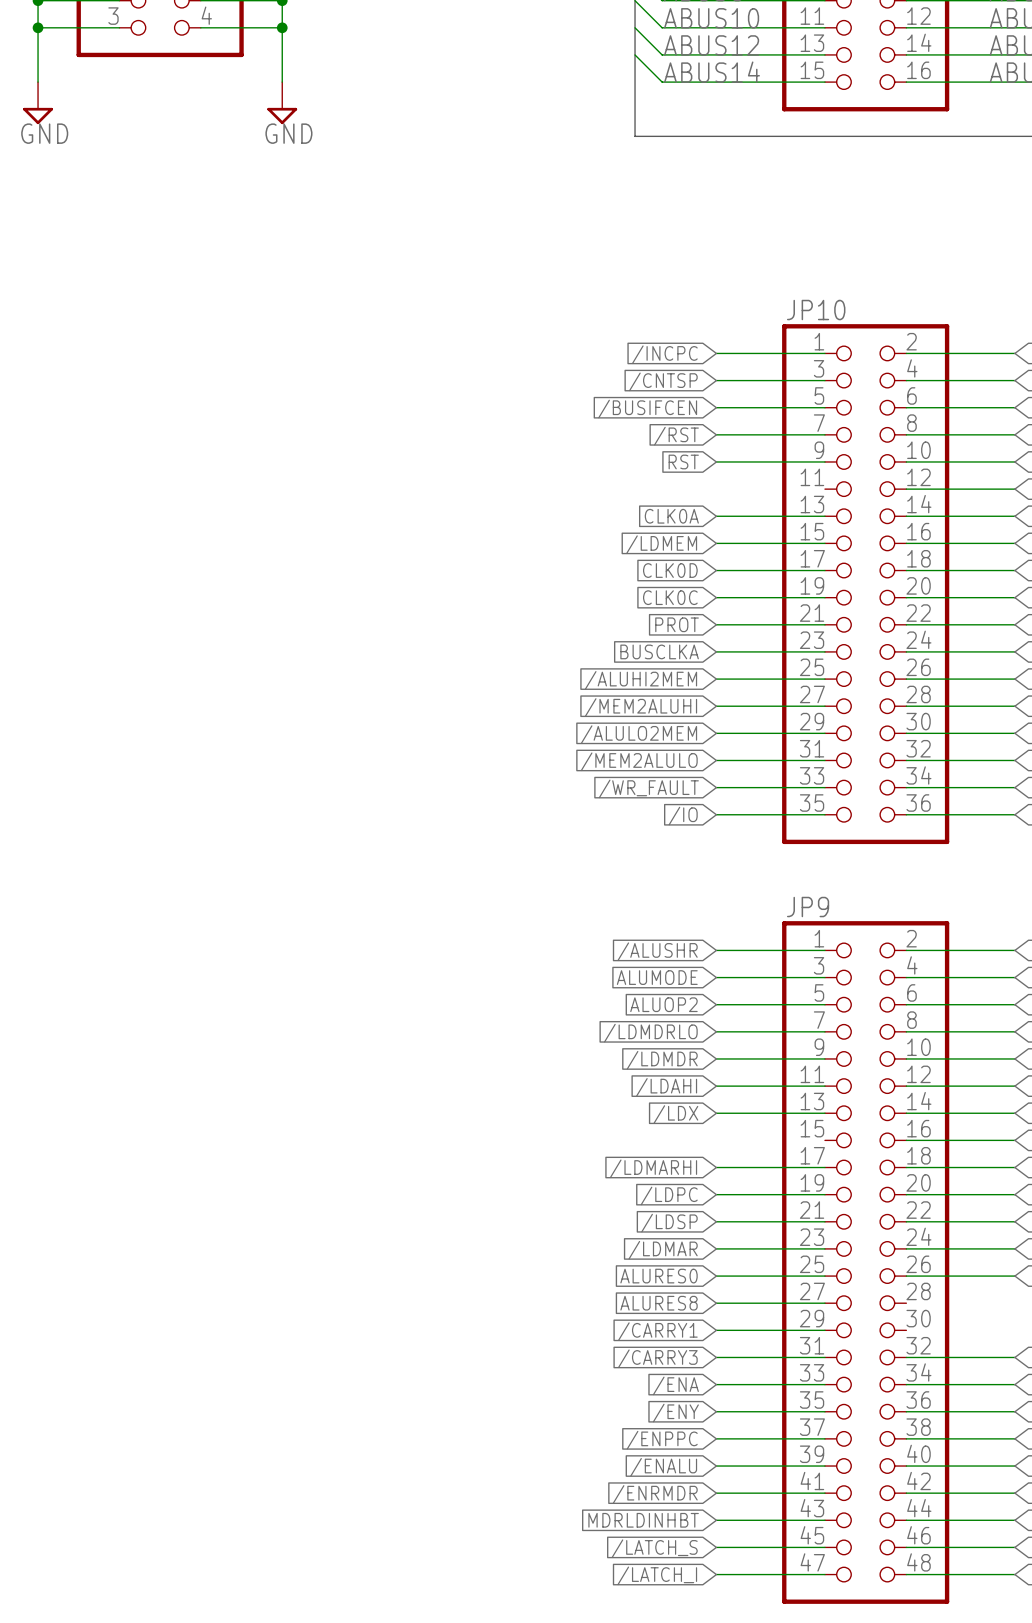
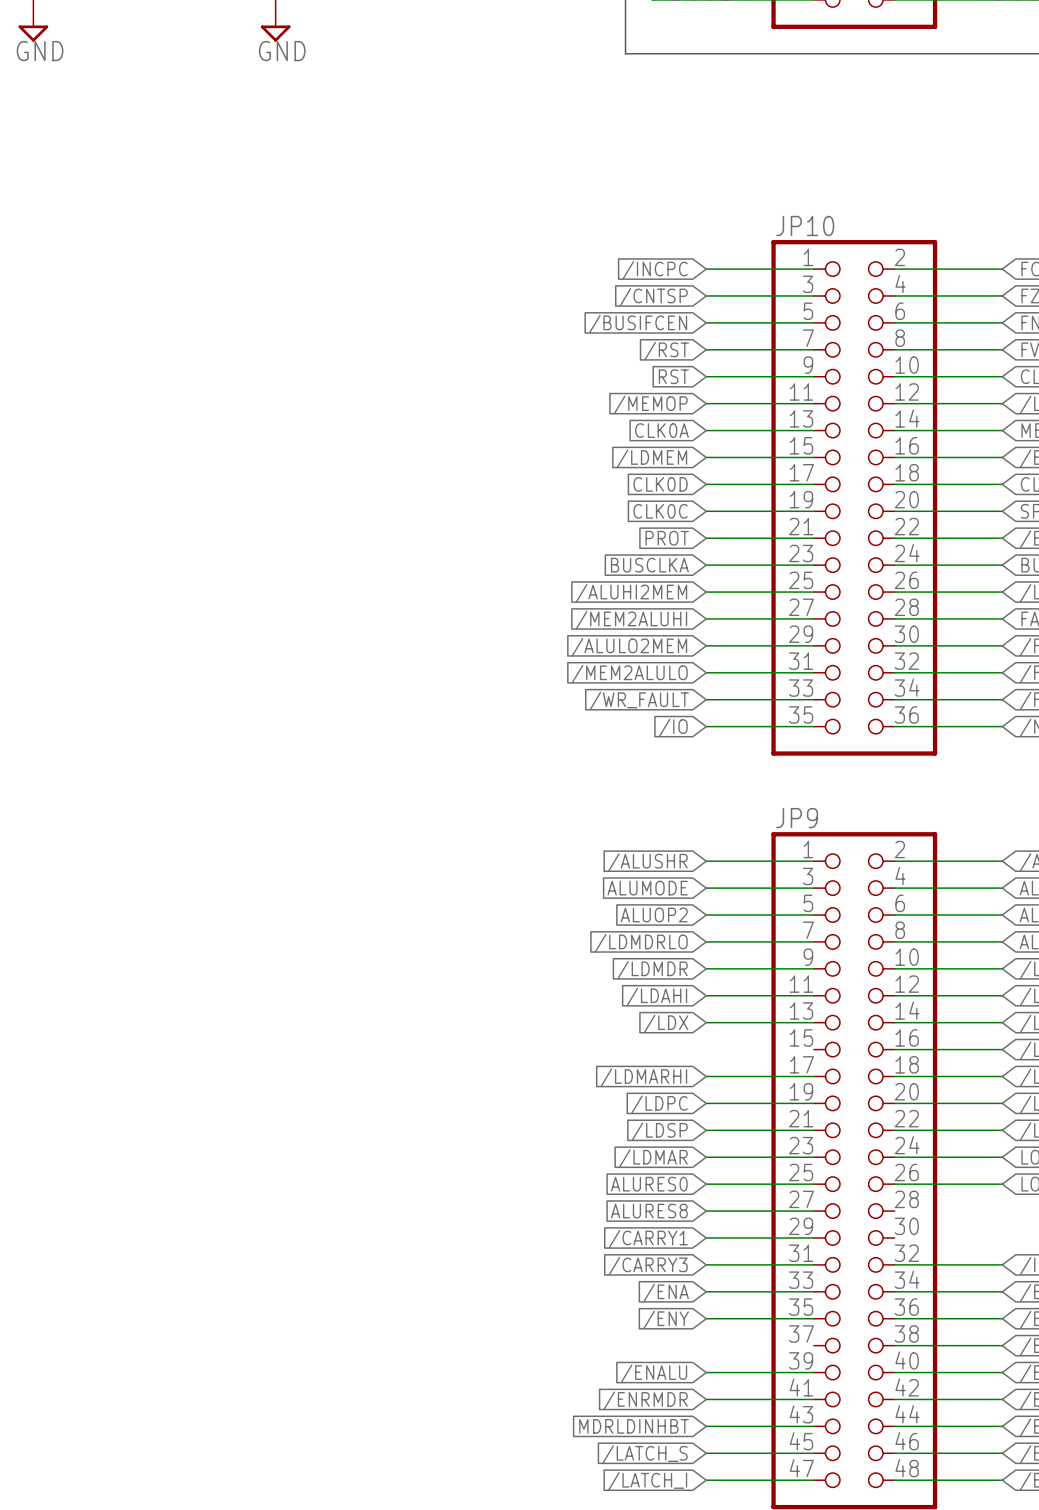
wire: none -> (706, 403) (813, 403)
global label: none -> /MEMOP (650, 404)
wire: (716, 1438) (824, 1438) -> none
global label: /ENPPC (662, 1440) -> none

